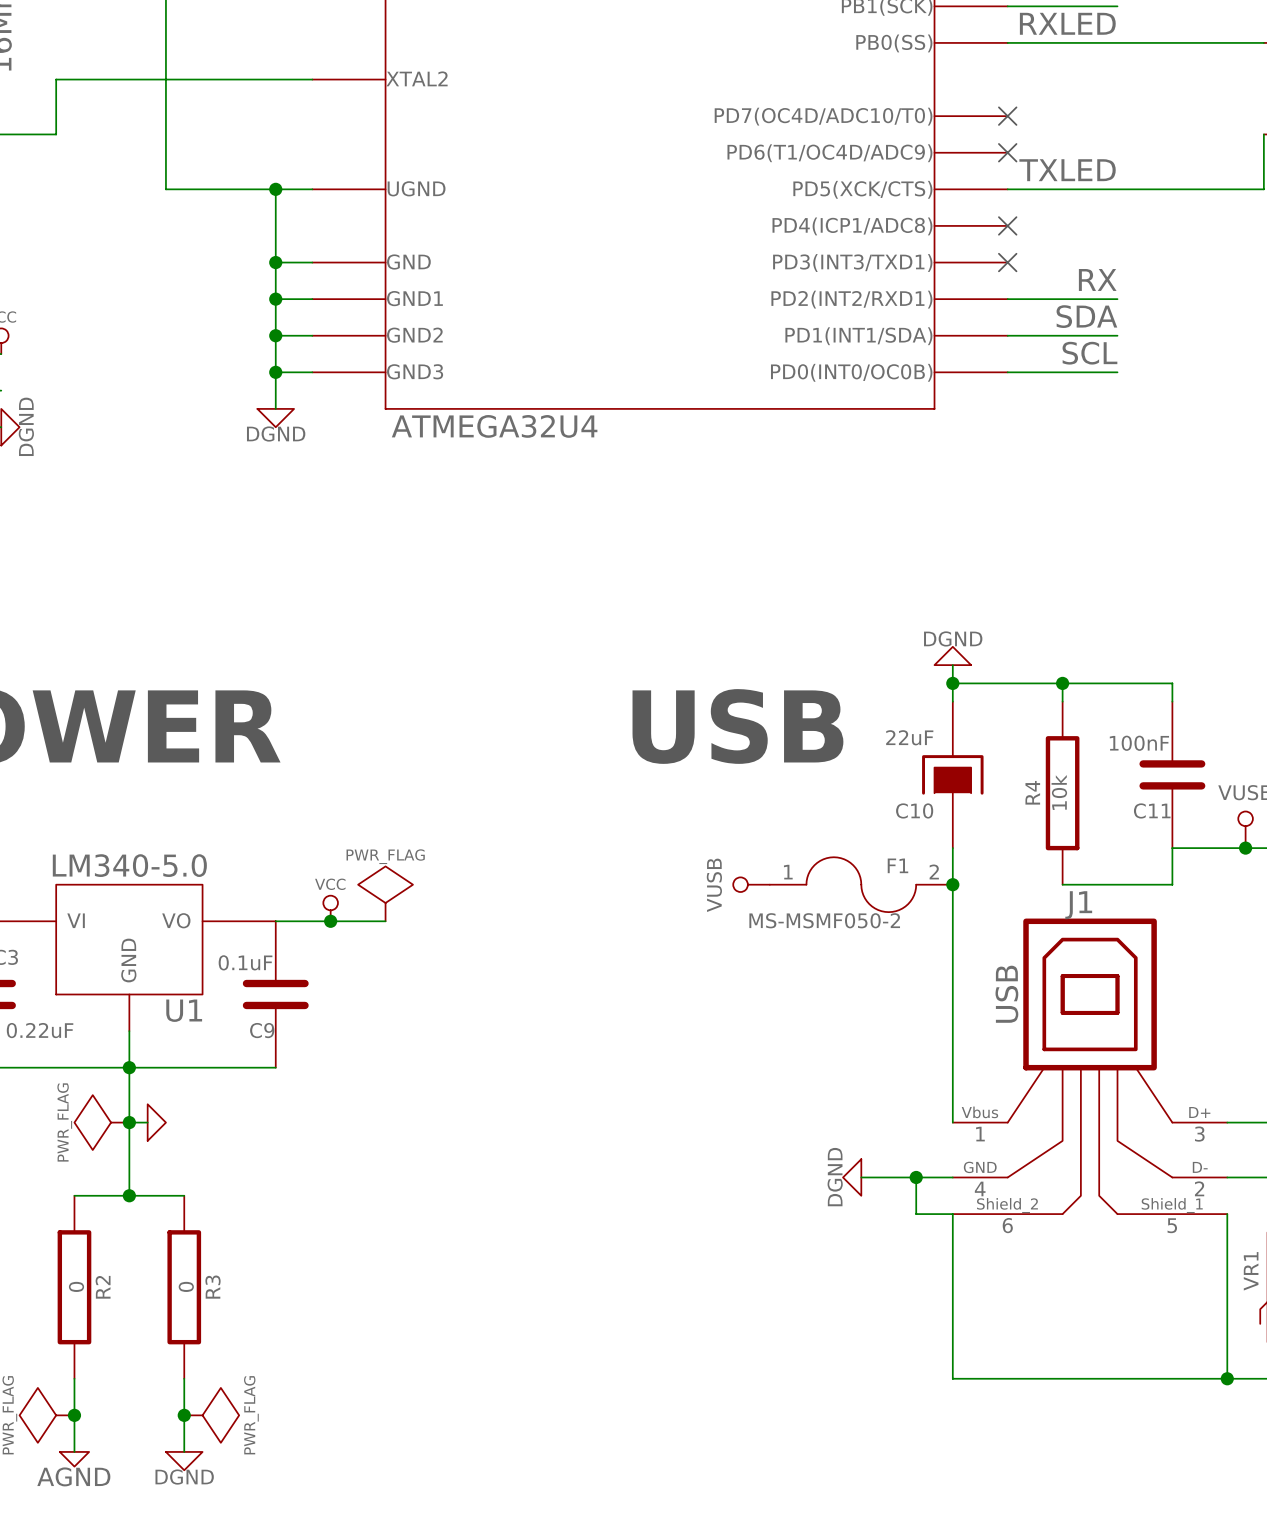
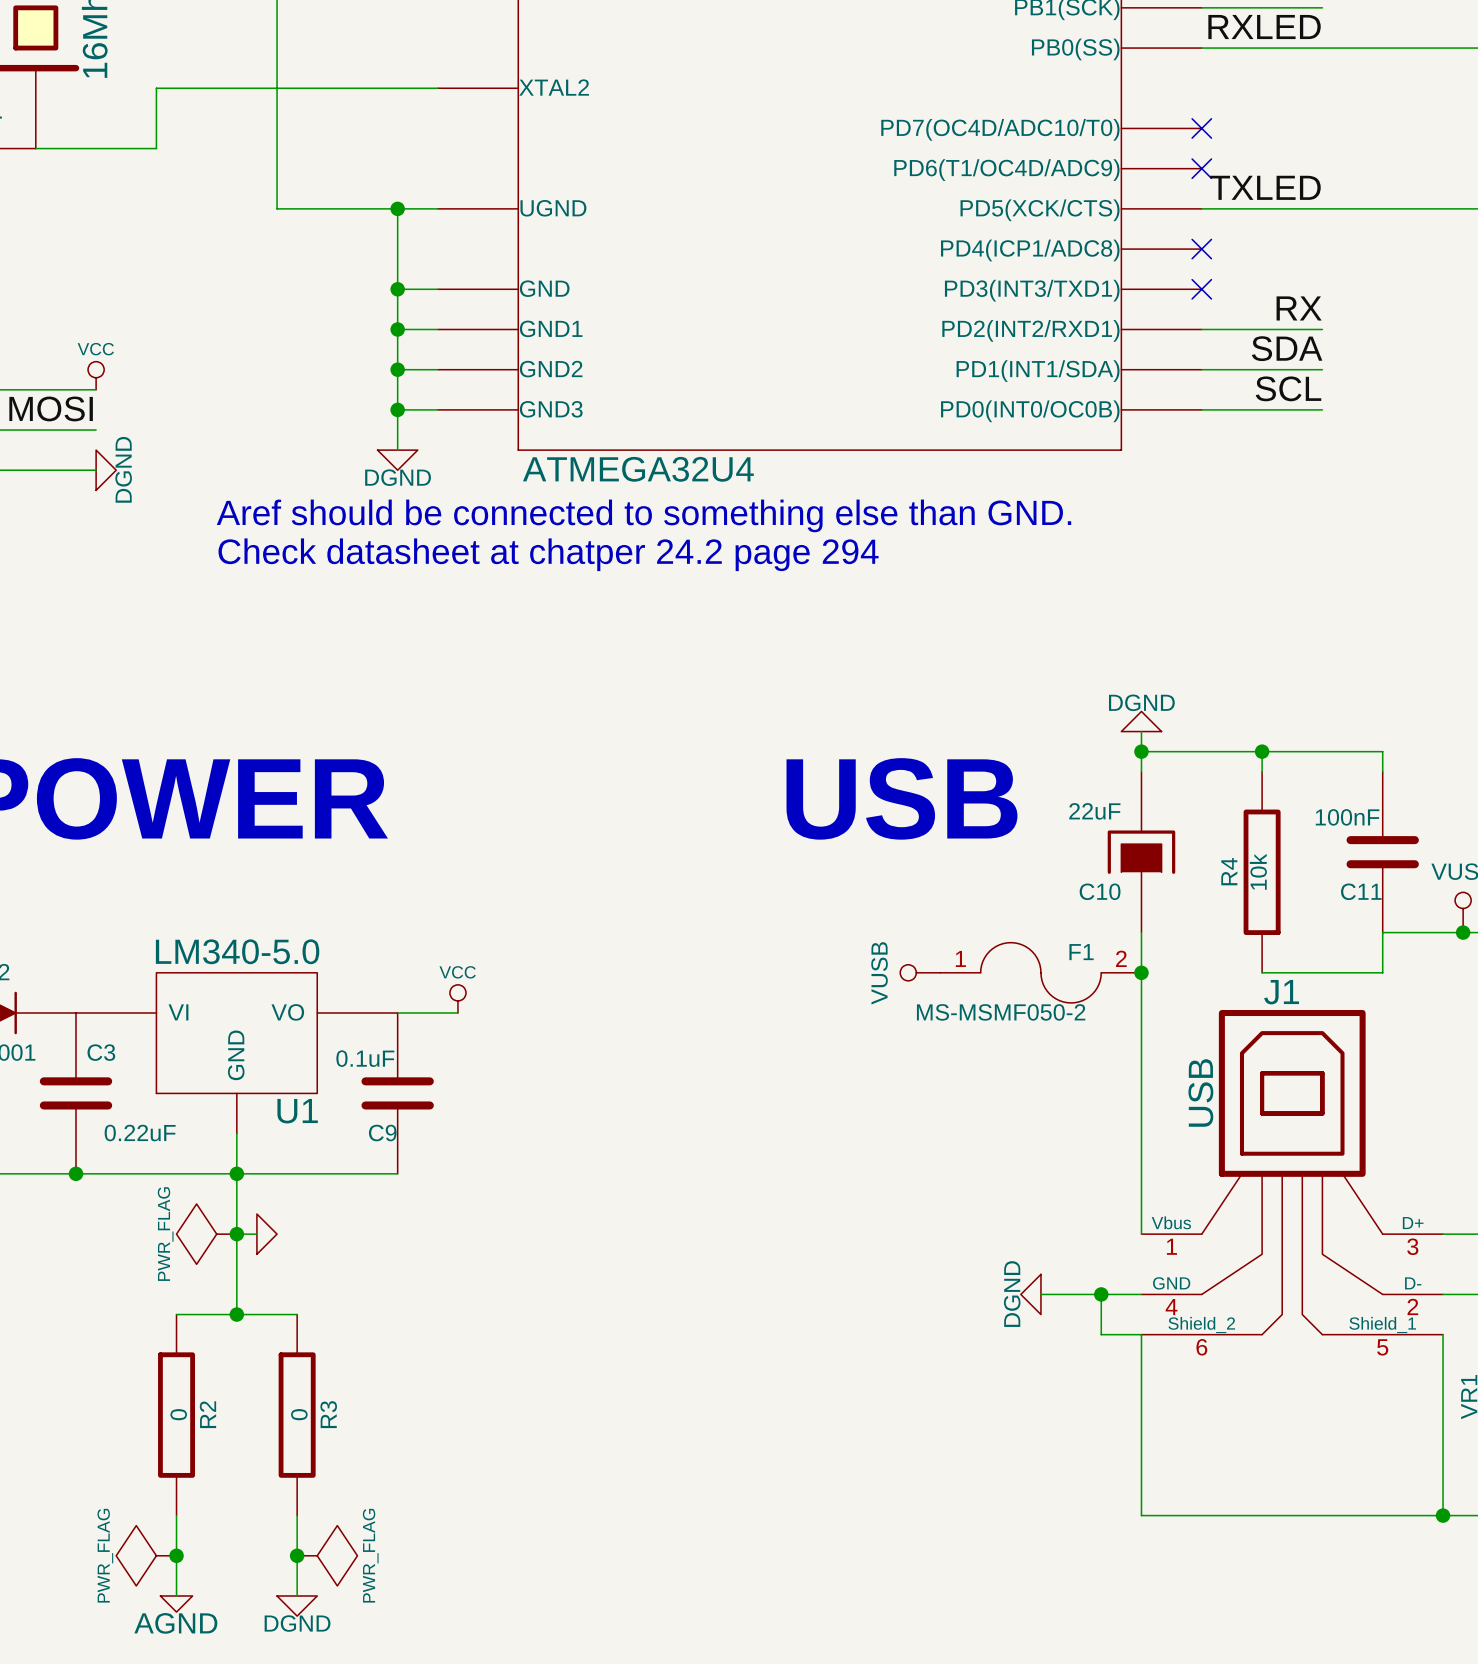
text: none -> Aref should be connected to something else than GND. (643, 515)
text: none -> Check datasheet at chatper 24.2 page 294 (548, 554)
power symbol: PWR_FLAG (385, 893) -> none
wire: (330, 921) (385, 921) -> none
junction: (330, 921) -> none

